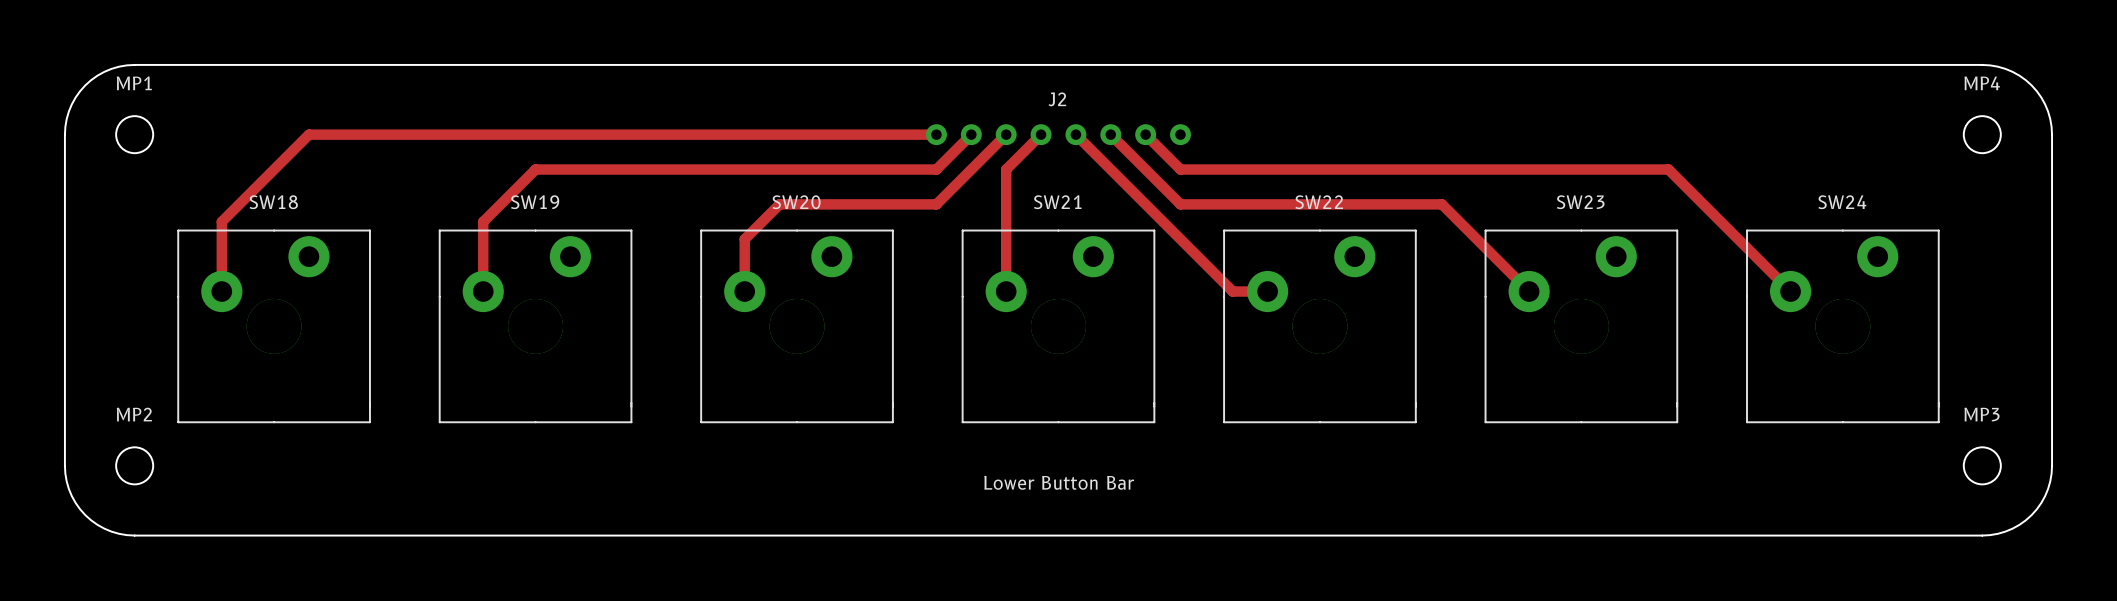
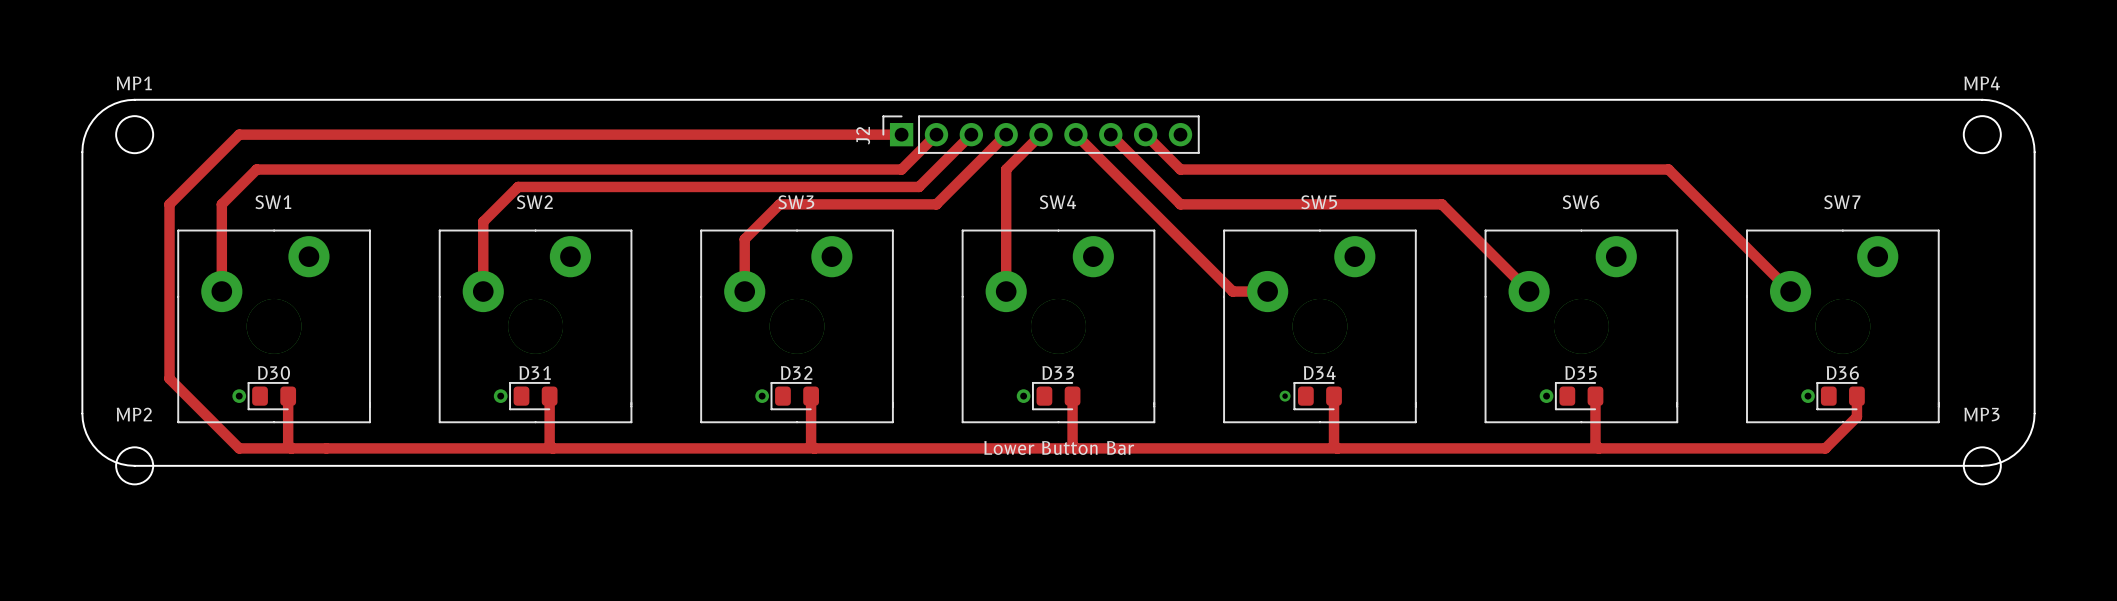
board edge: (134, 64) (1982, 64) (1997, 66) (2019, 75) (2031, 85) (2045, 104) (2051, 126) (2052, 465) (2050, 481) (2041, 502) (2025, 520) (2005, 531) (1982, 535) (134, 535) (119, 533) (104, 528) (85, 515) (71, 496) (65, 473) (64, 134) (66, 119) (71, 104) (85, 85) (104, 71) (119, 66) (134, 64) -> (134, 99) (114, 103) (97, 115) (86, 132) (82, 152) (82, 420) (86, 433) (97, 450) (114, 461) (127, 465) (1982, 465) (2002, 461) (2019, 450) (2027, 439) (2034, 420) (2034, 145) (2027, 125) (2019, 115) (2002, 103) (1989, 100) (134, 99)
J2 name position: J2 (1057, 99) -> J2 (863, 135)
J2 footprint: [926, 124, 1191, 146] -> [882, 115, 1200, 154]
track: (308, 134) (221, 221) -> (535, 169) (256, 169) (221, 204) (221, 221)
track: none -> (308, 134) (239, 134) (169, 204) (169, 378) (239, 448) (1825, 448) (1856, 416) (1856, 396)
track: (901, 134) (936, 134) -> (901, 169) (936, 134)
track: (535, 169) (518, 186) -> none
track: (901, 169) (936, 169) -> (518, 186) (919, 186) (936, 169)
SW18 name: SW18 (273, 202) -> SW1 (273, 202)
SW19 name: SW19 (535, 202) -> SW2 (534, 202)
SW20 name: SW20 (796, 202) -> SW3 (796, 202)
SW21 name: SW21 (1057, 202) -> SW4 (1057, 202)
SW22 name: SW22 (1319, 202) -> SW5 (1319, 202)
SW23 name: SW23 (1580, 202) -> SW6 (1580, 202)
SW24 name: SW24 (1842, 202) -> SW7 (1842, 202)
via: none -> (239, 396)
D30: none -> (271, 396)
track: none -> (288, 396) (288, 445) (291, 448)
via: none -> (500, 396)
D31: none -> (533, 396)
track: none -> (549, 396) (549, 445) (552, 448)
via: none -> (762, 396)
D32: none -> (794, 396)
track: none -> (811, 396) (811, 445) (814, 448)
via: none -> (1023, 396)
D33: none -> (1056, 396)
track: none -> (1072, 396) (1072, 445) (1075, 448)
via: none -> (1285, 396)
D34: none -> (1317, 396)
track: none -> (1334, 396) (1334, 445) (1337, 448)
via: none -> (1546, 396)
D35: none -> (1579, 396)
track: none -> (1595, 396) (1595, 445) (1598, 448)
via: none -> (1808, 396)
D36: none -> (1840, 396)
text position: Lower Button Bar (1059, 482) -> Lower Button Bar (1059, 447)

